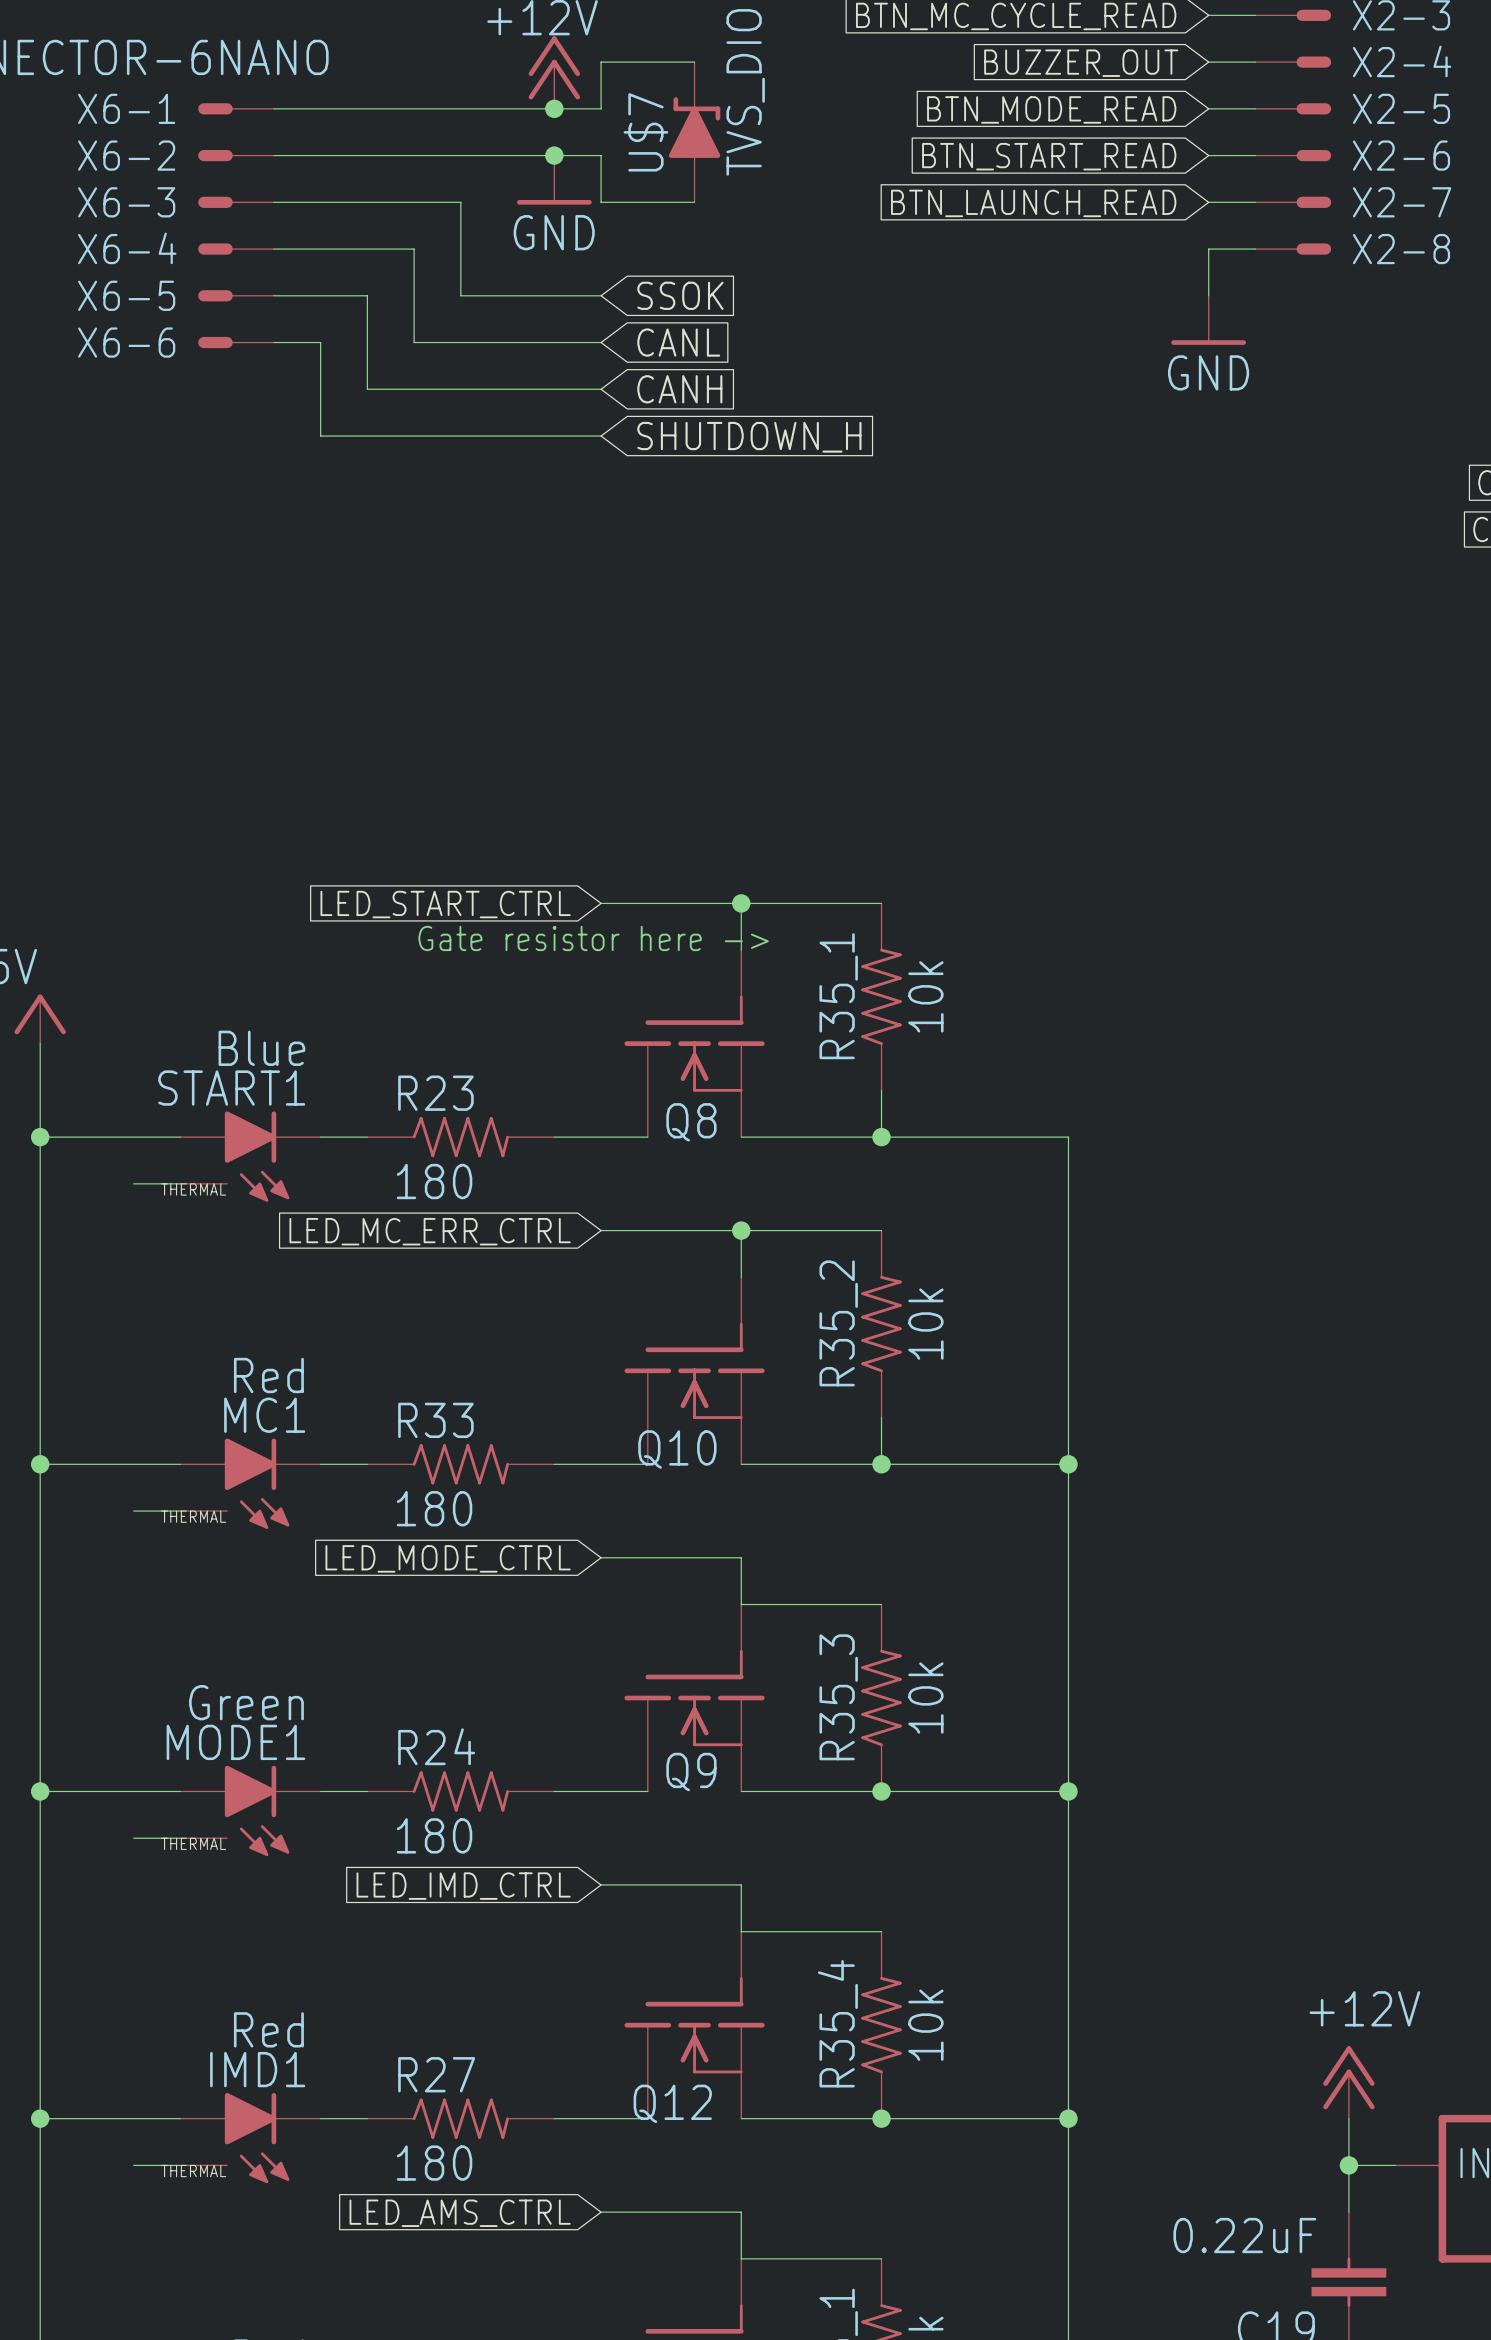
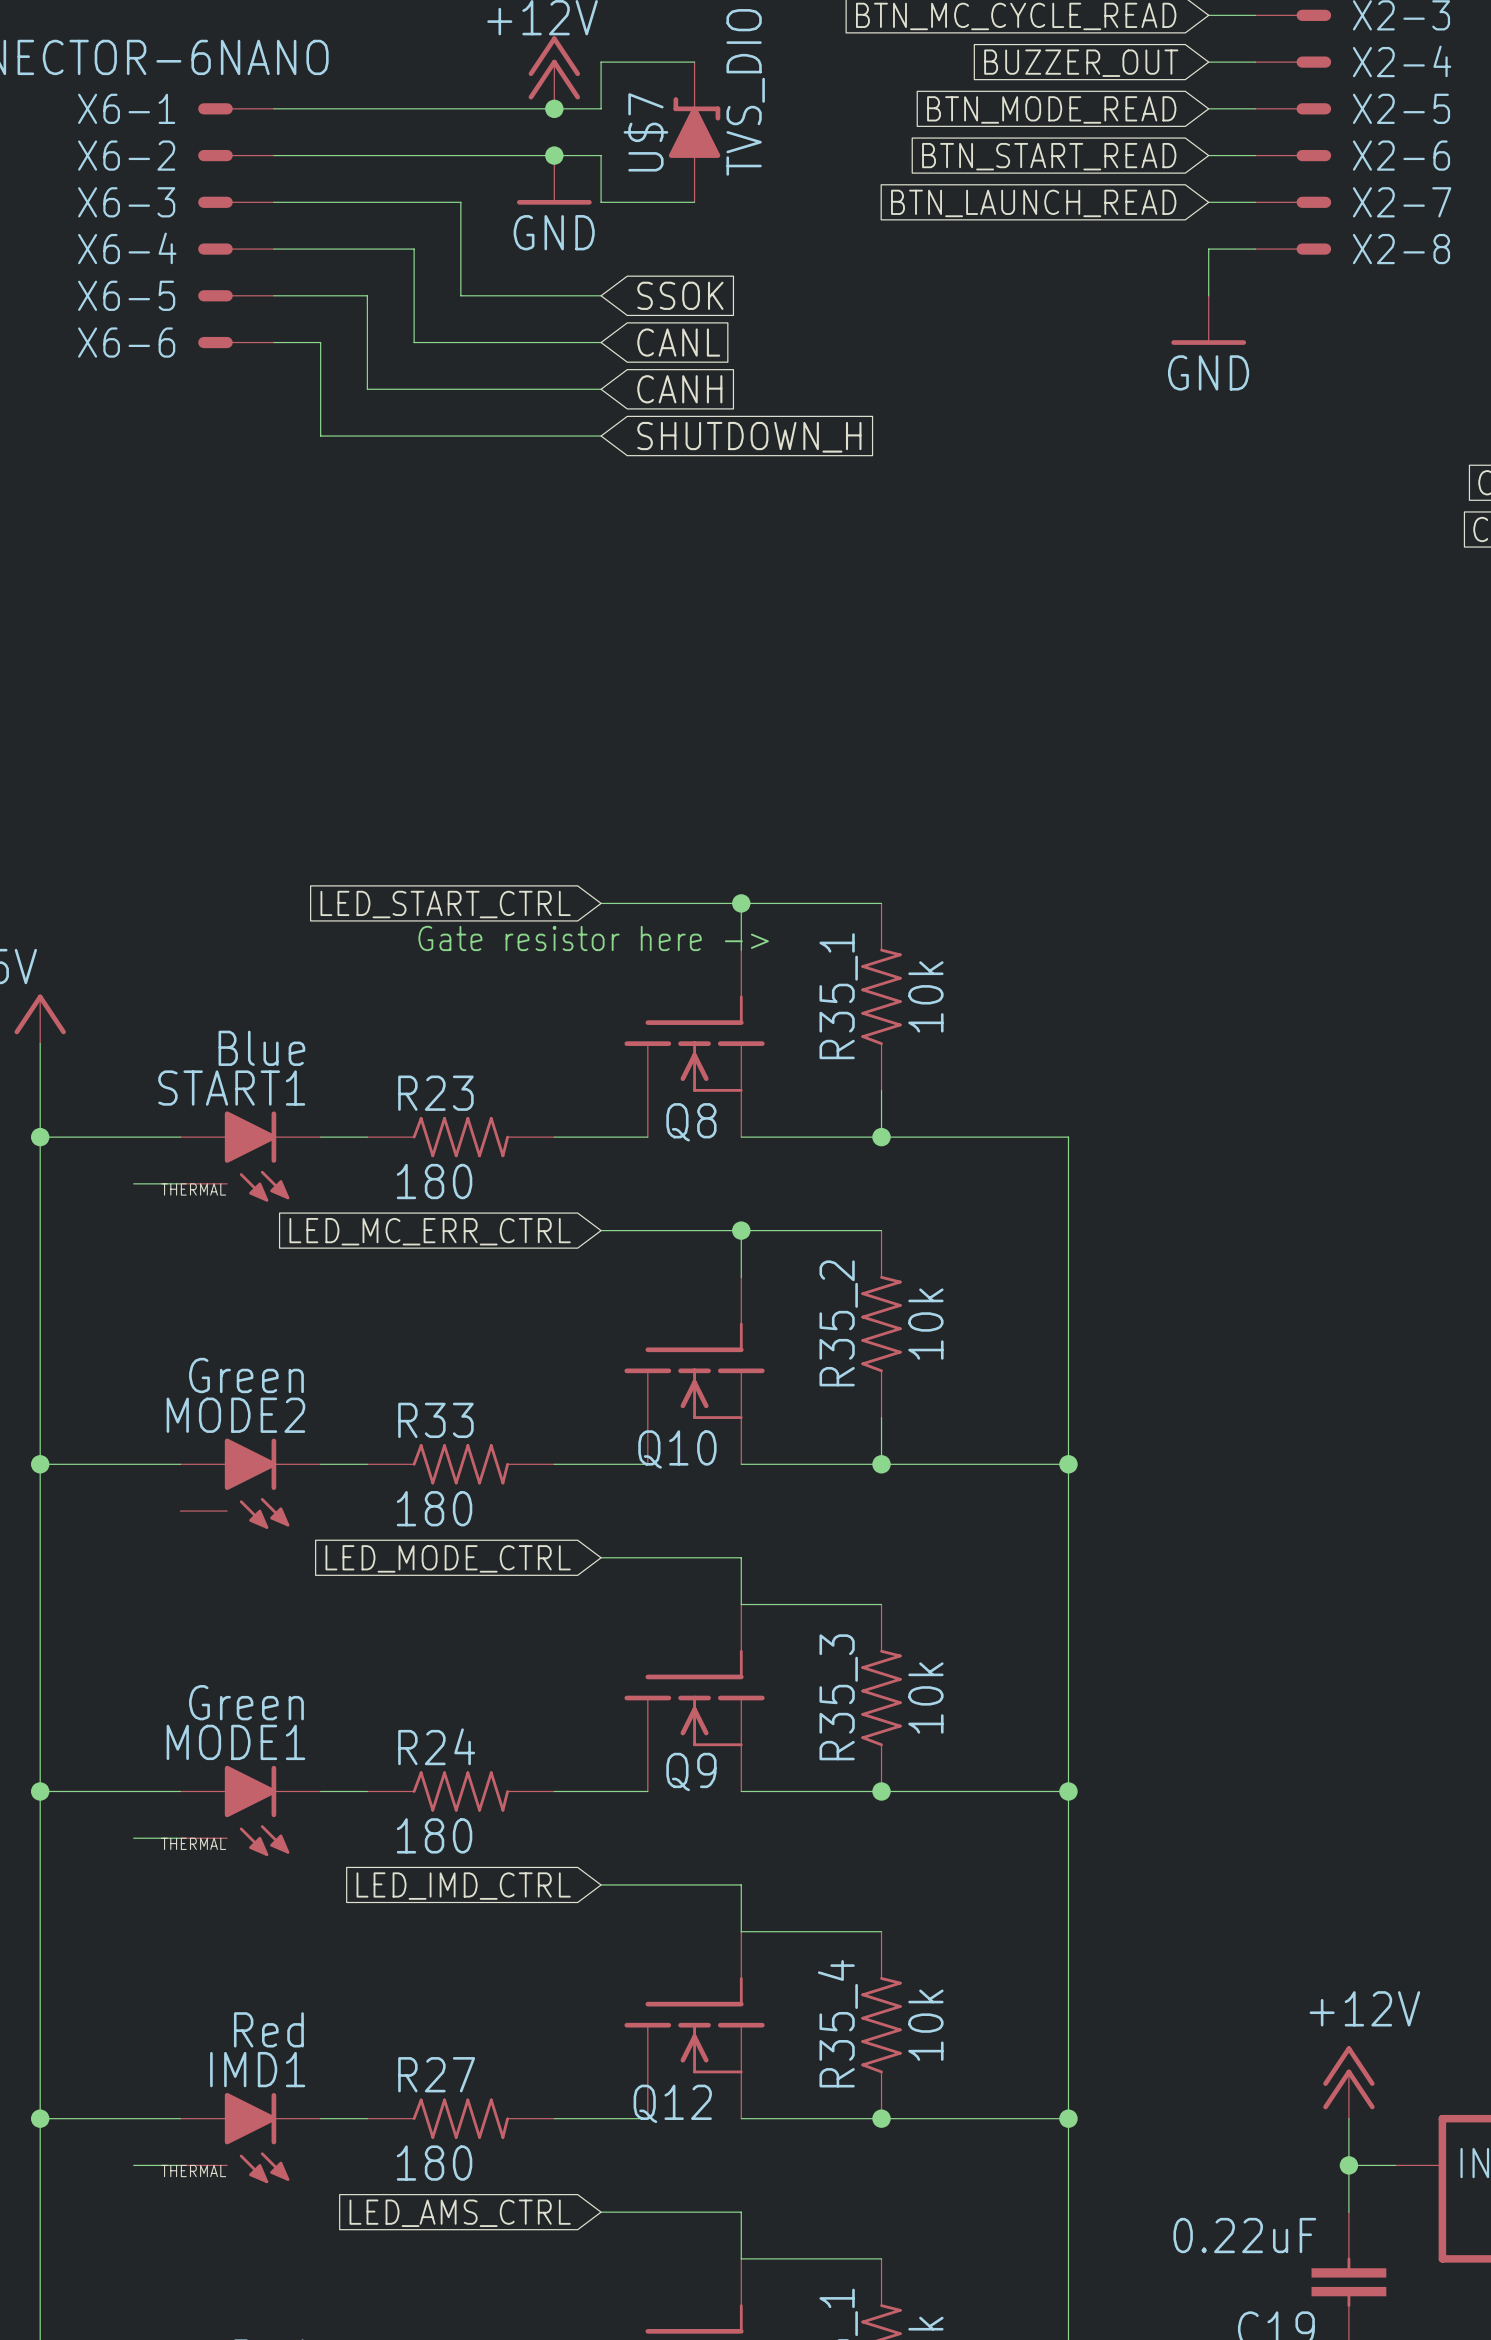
MC1 value: Red (268, 1375) -> Green (246, 1375)
MC1 name: MC1 (264, 1415) -> MODE2 (235, 1415)
wire: (133, 1511) (180, 1511) -> none
label: THERMAL (193, 1516) -> none

